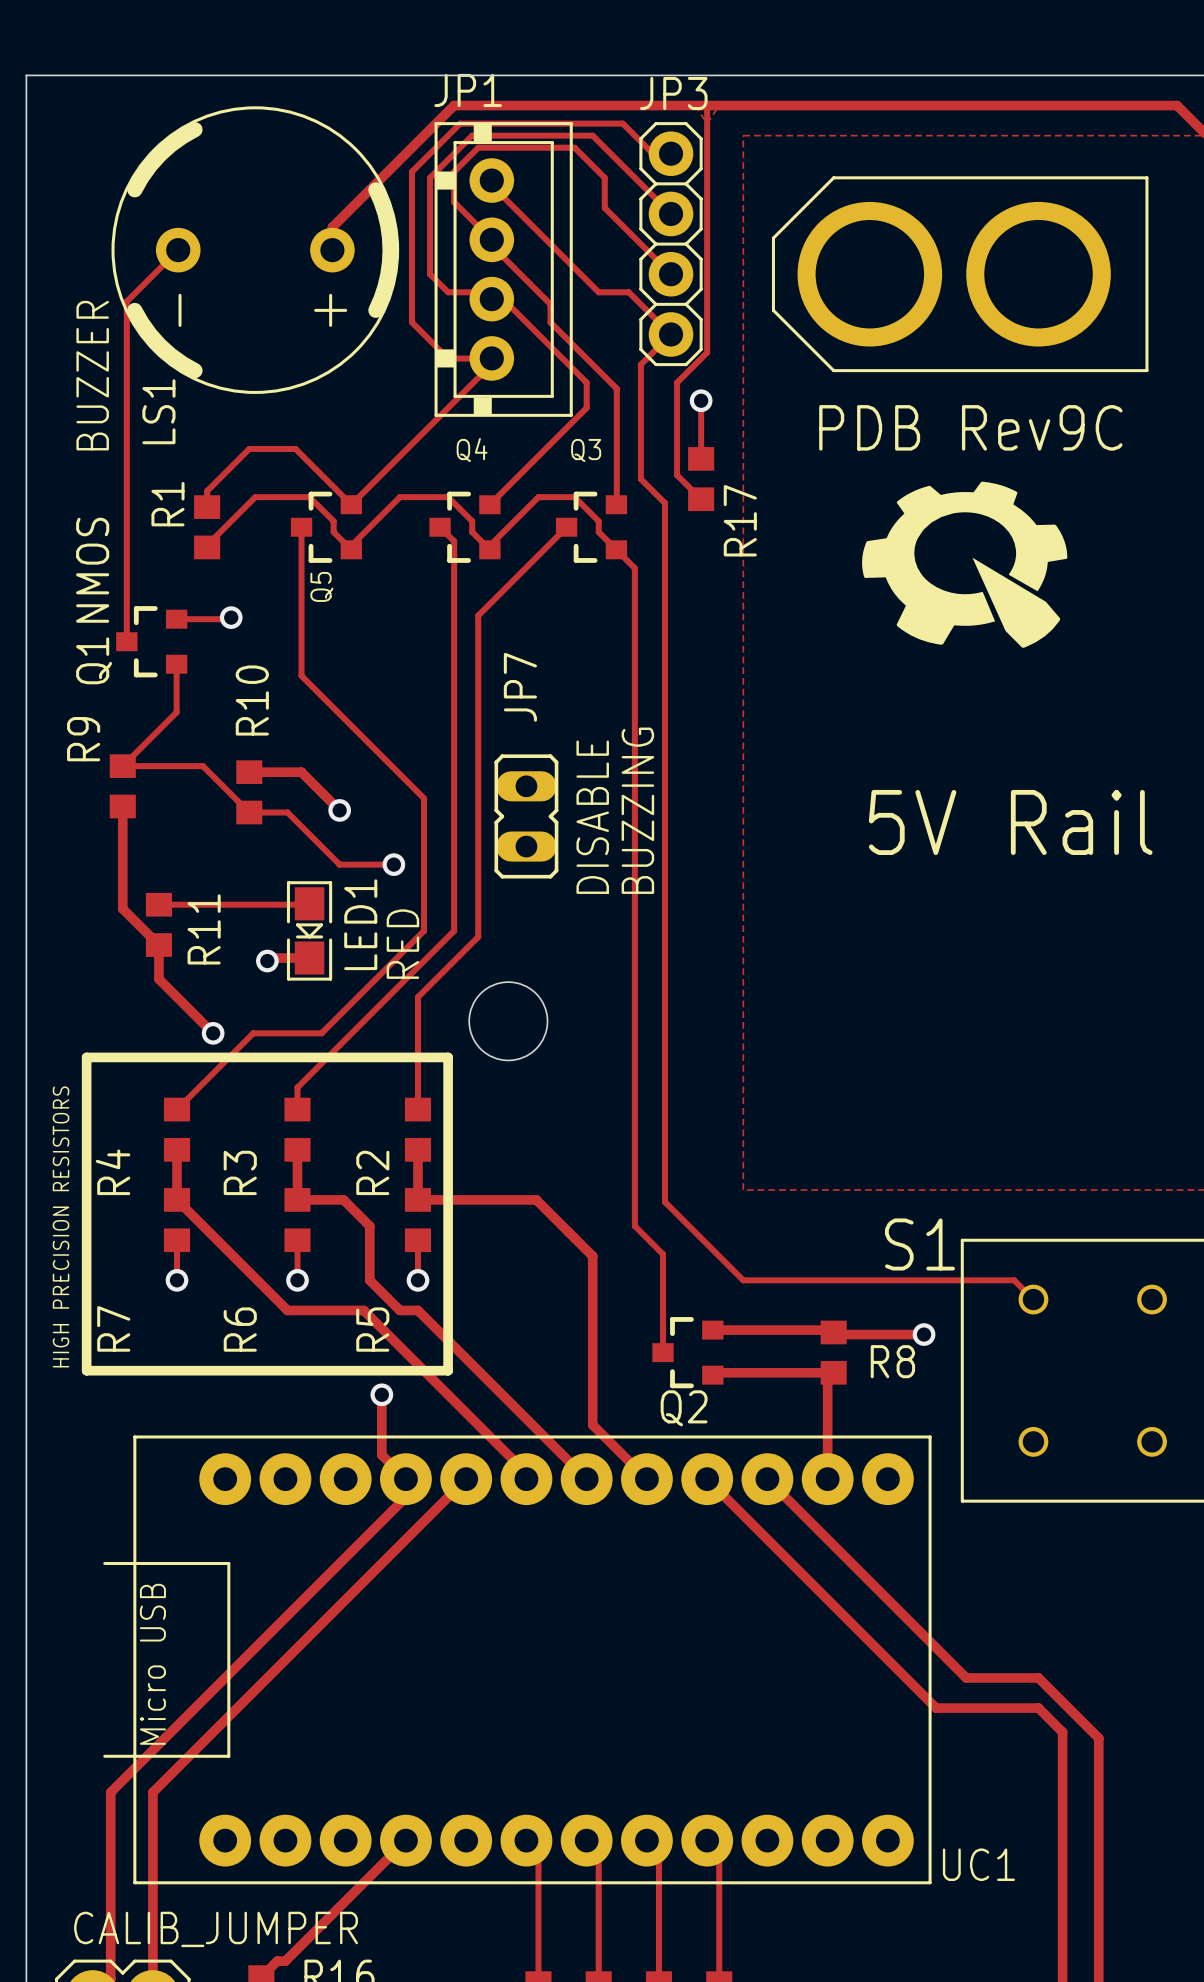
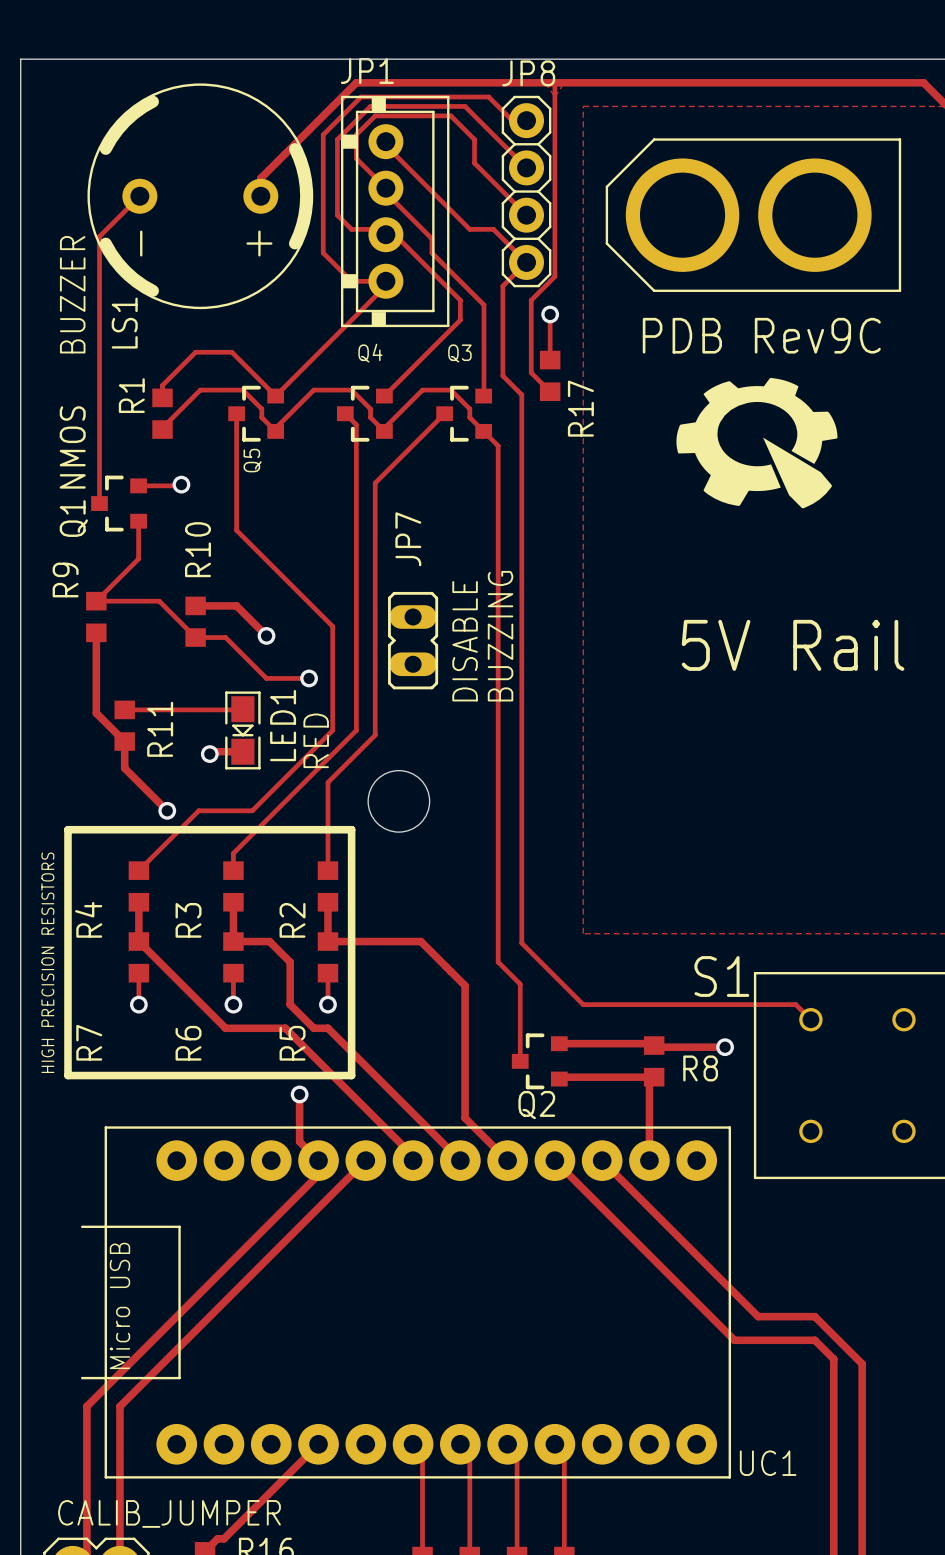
JP3 name: JP3 (673, 93) -> JP8 (528, 73)

